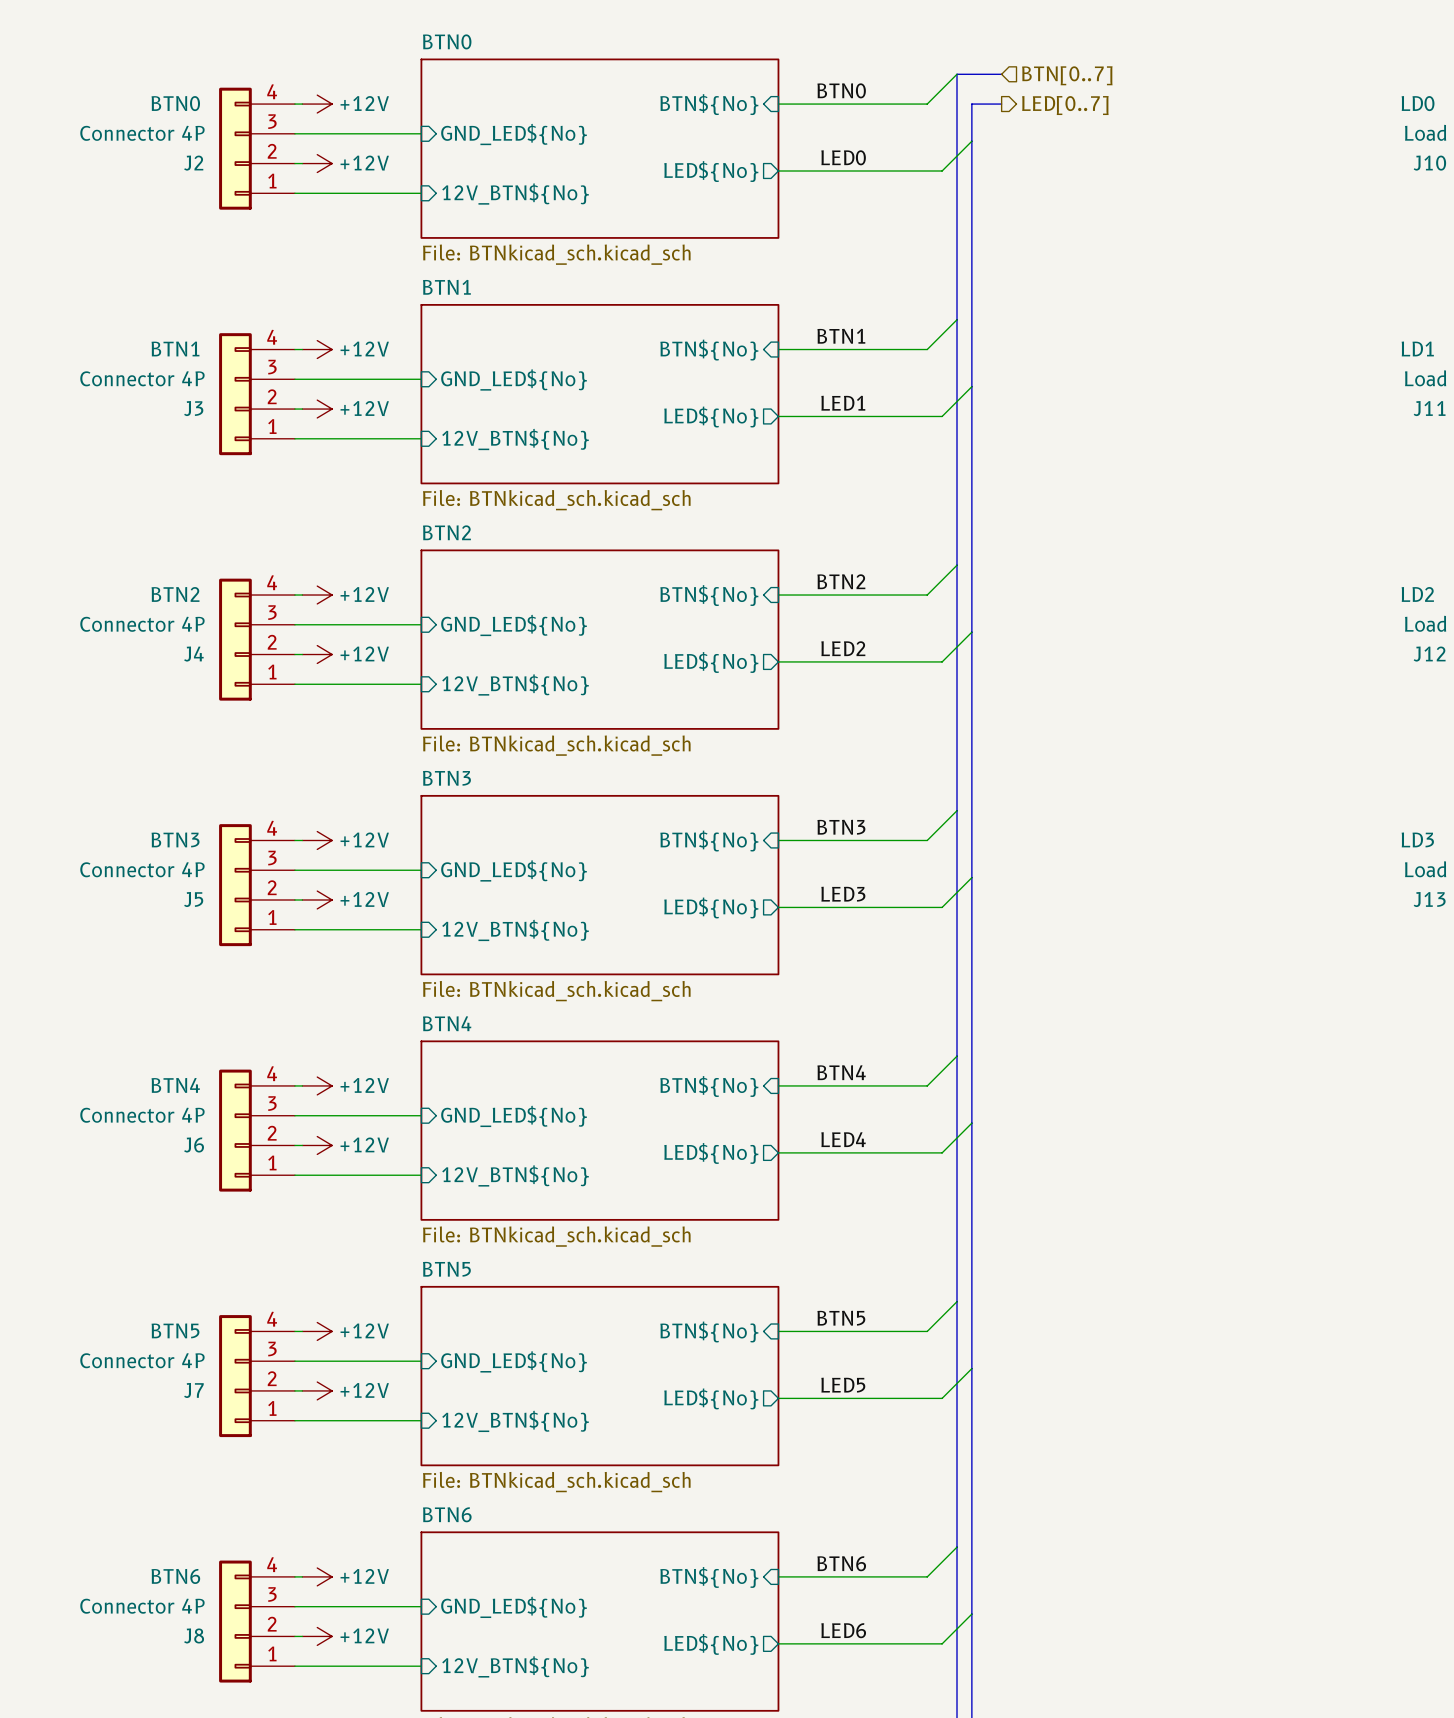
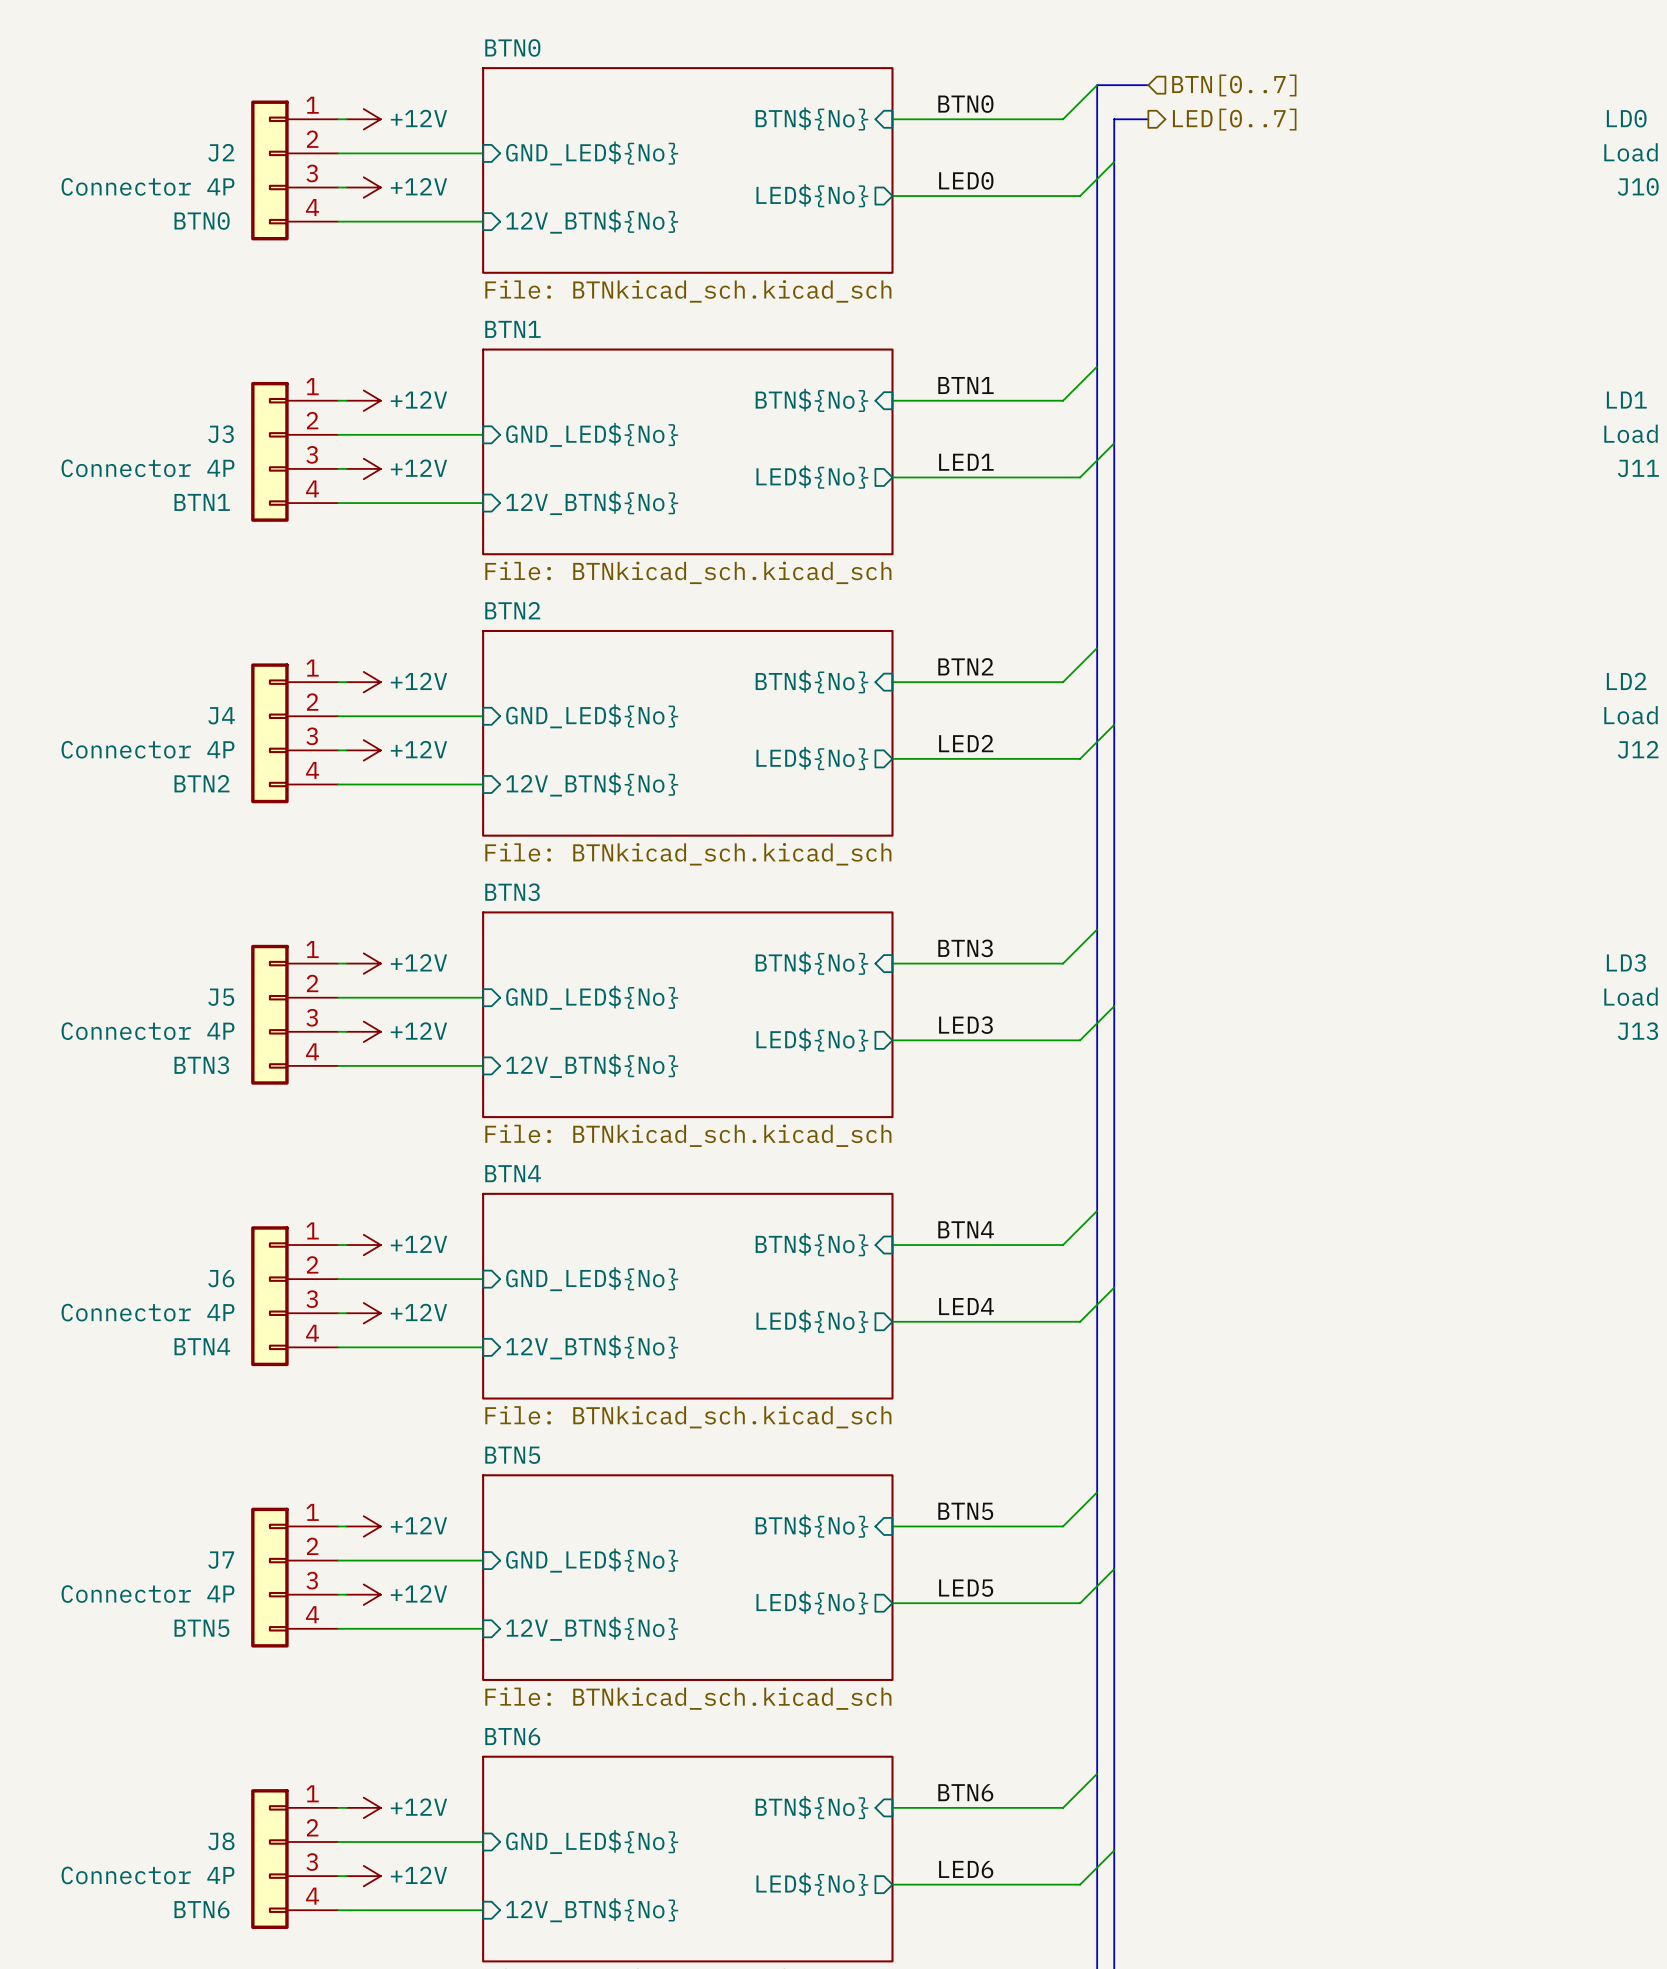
J2 flip: as is (235, 148) -> up-down (269, 170)
J3 flip: as is (235, 394) -> up-down (269, 451)
J4 flip: as is (235, 639) -> up-down (269, 733)
J5 flip: as is (235, 885) -> up-down (269, 1014)
J6 flip: as is (235, 1130) -> up-down (269, 1296)
J7 flip: as is (235, 1376) -> up-down (269, 1577)
J8 flip: as is (235, 1621) -> up-down (269, 1859)

